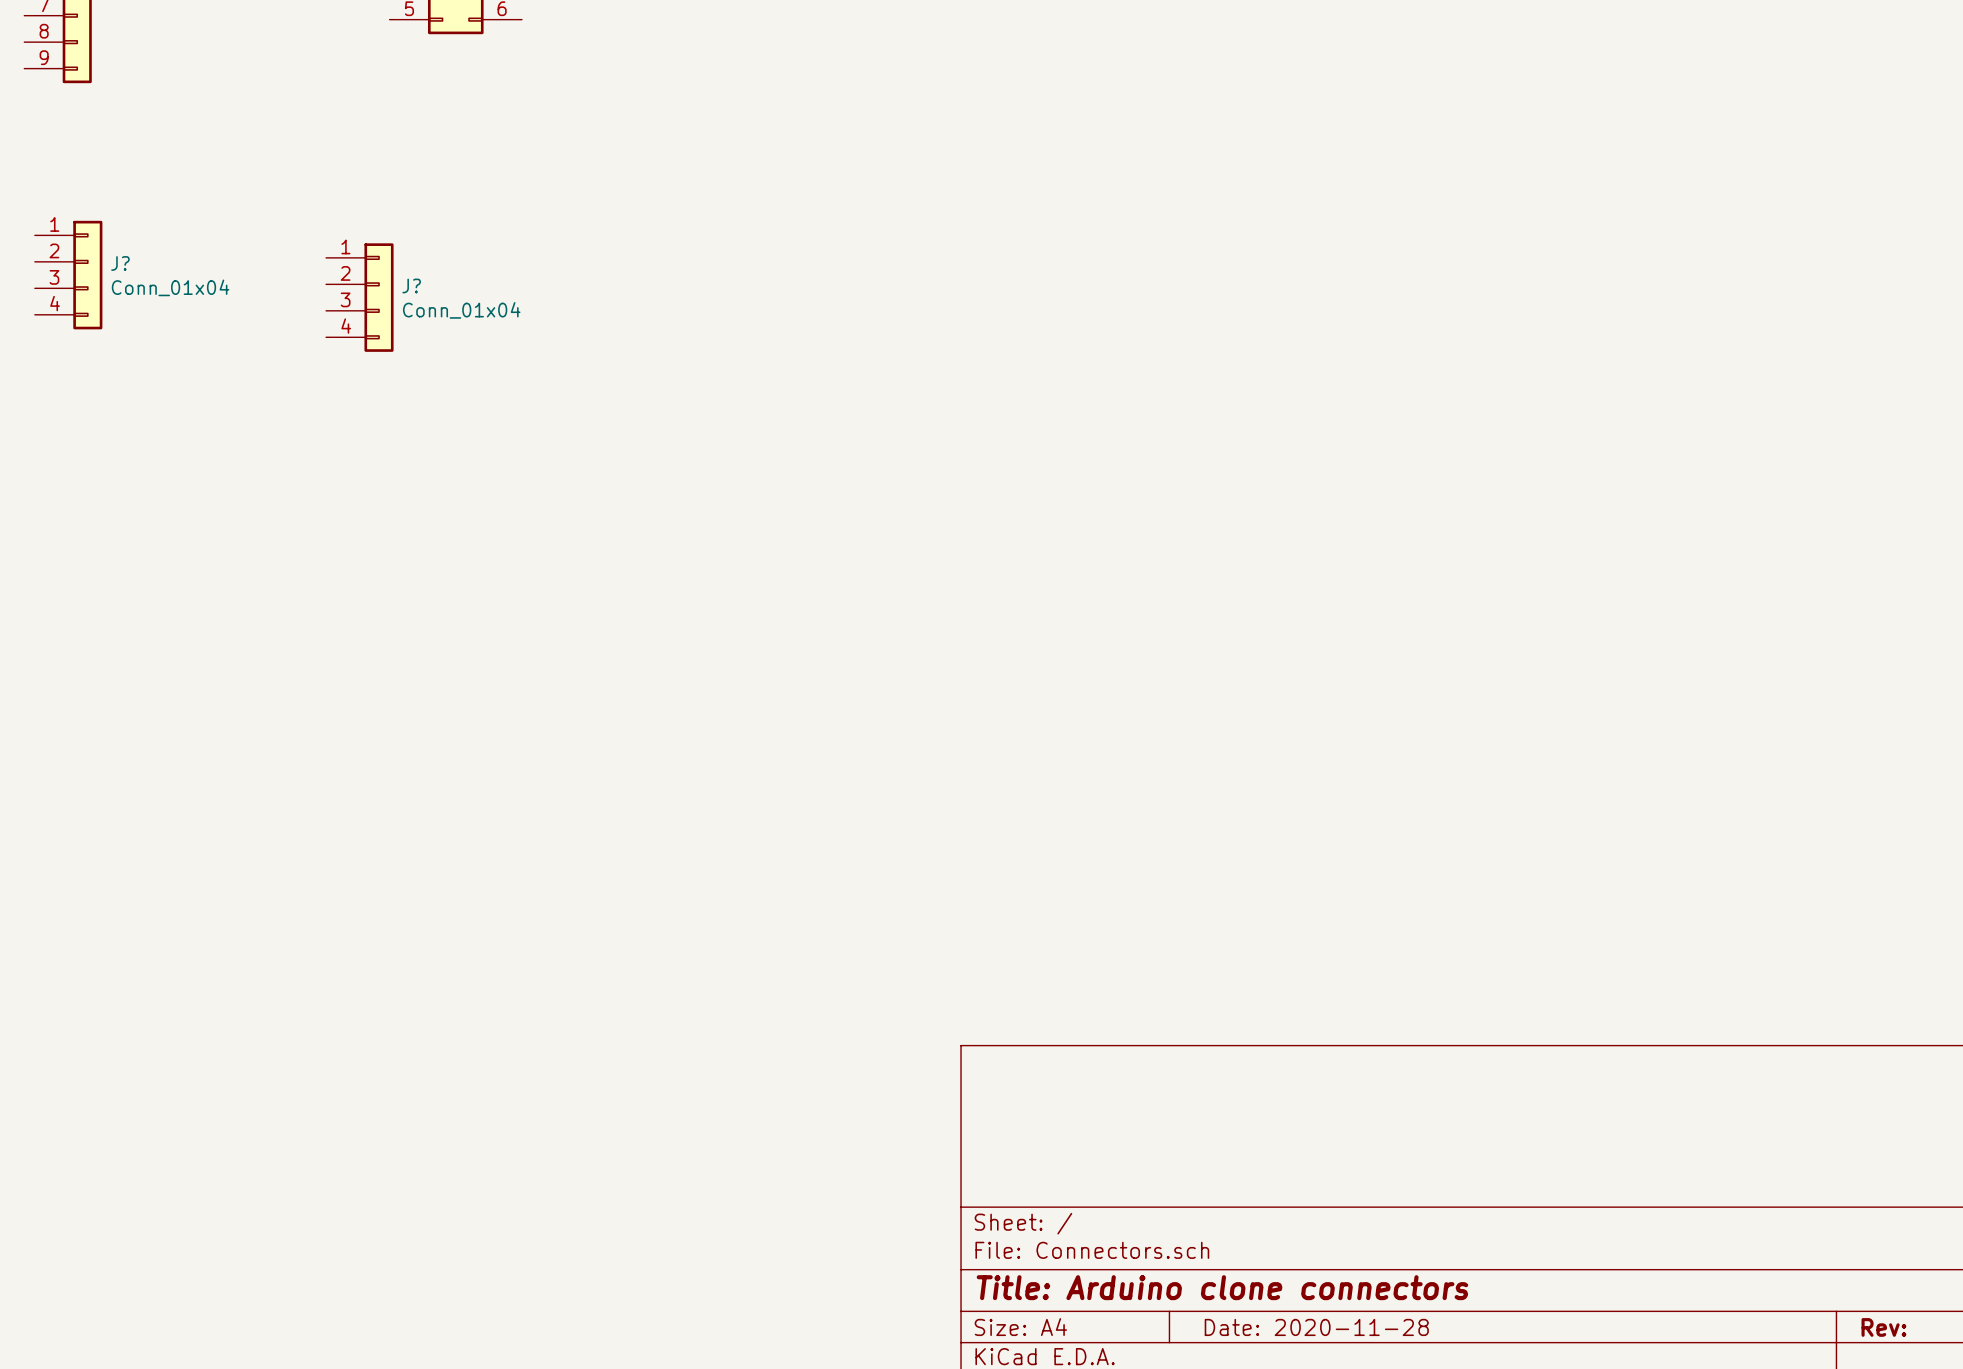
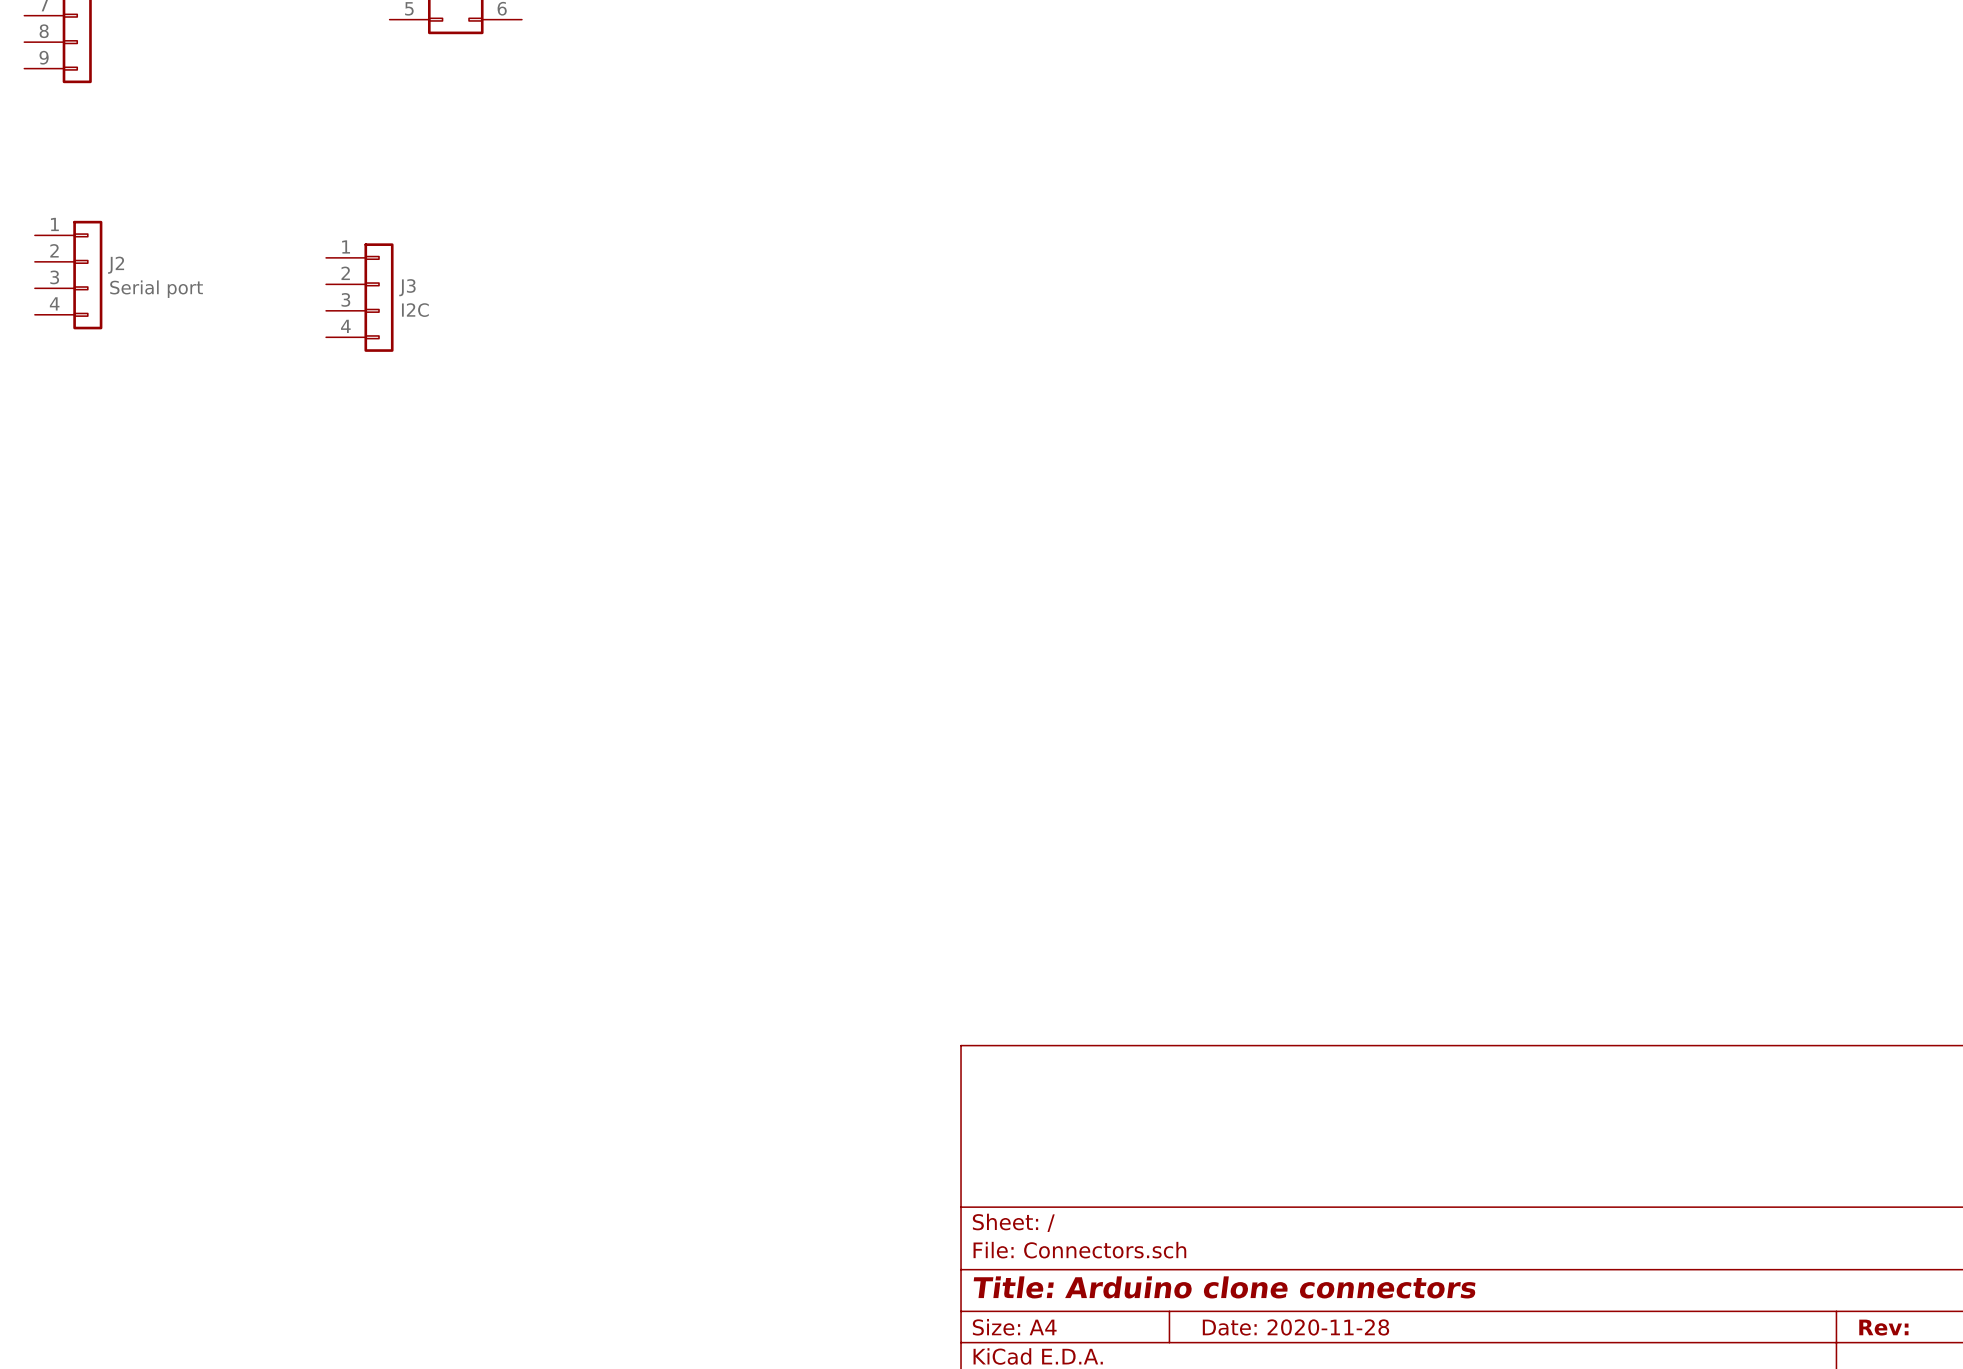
J? name: J? (120, 263) -> J2 (116, 265)
J? name: J? (411, 285) -> J3 (407, 287)
J? value: Conn_01x04 (170, 287) -> Serial port (156, 289)
J? value: Conn_01x04 (461, 310) -> I2C (415, 310)

